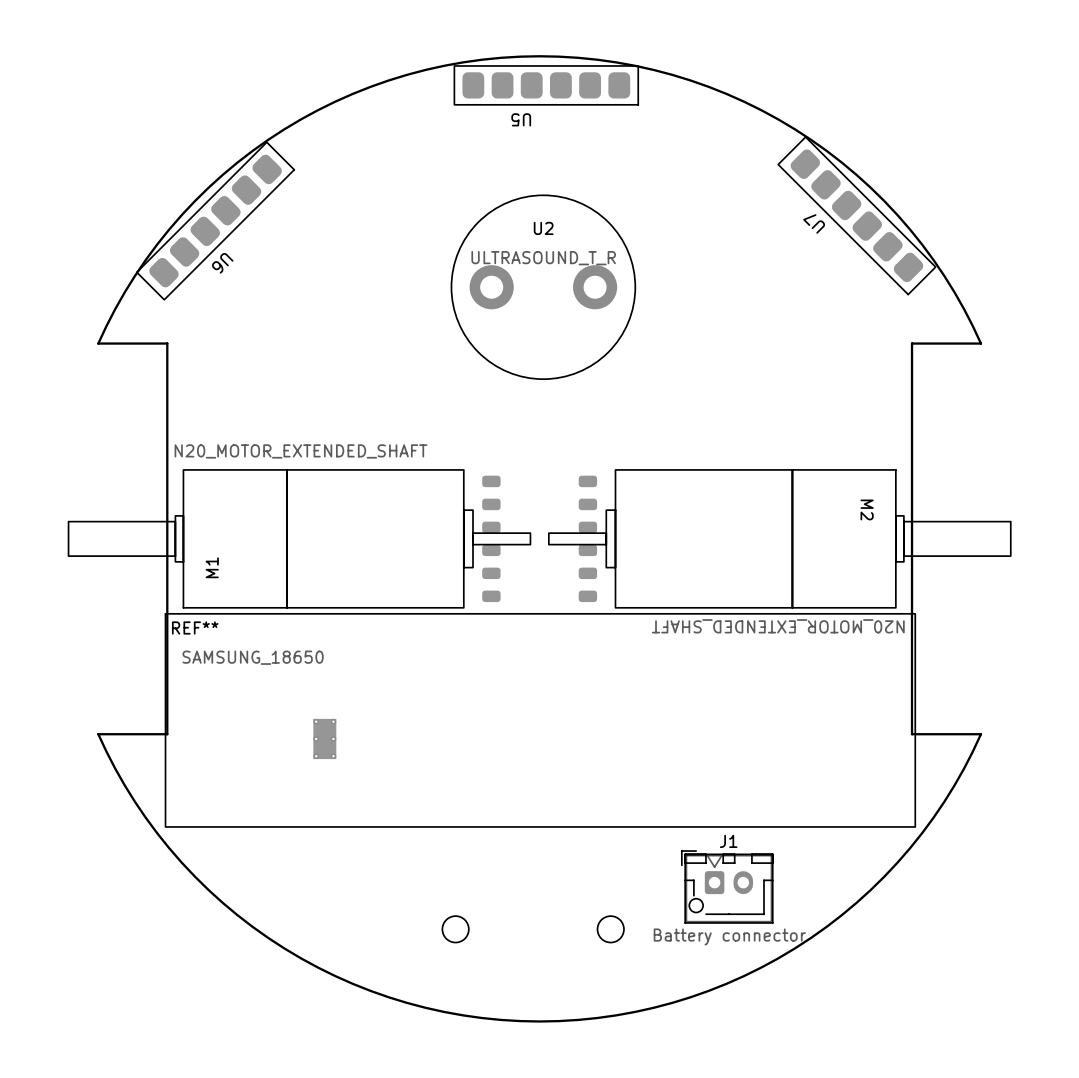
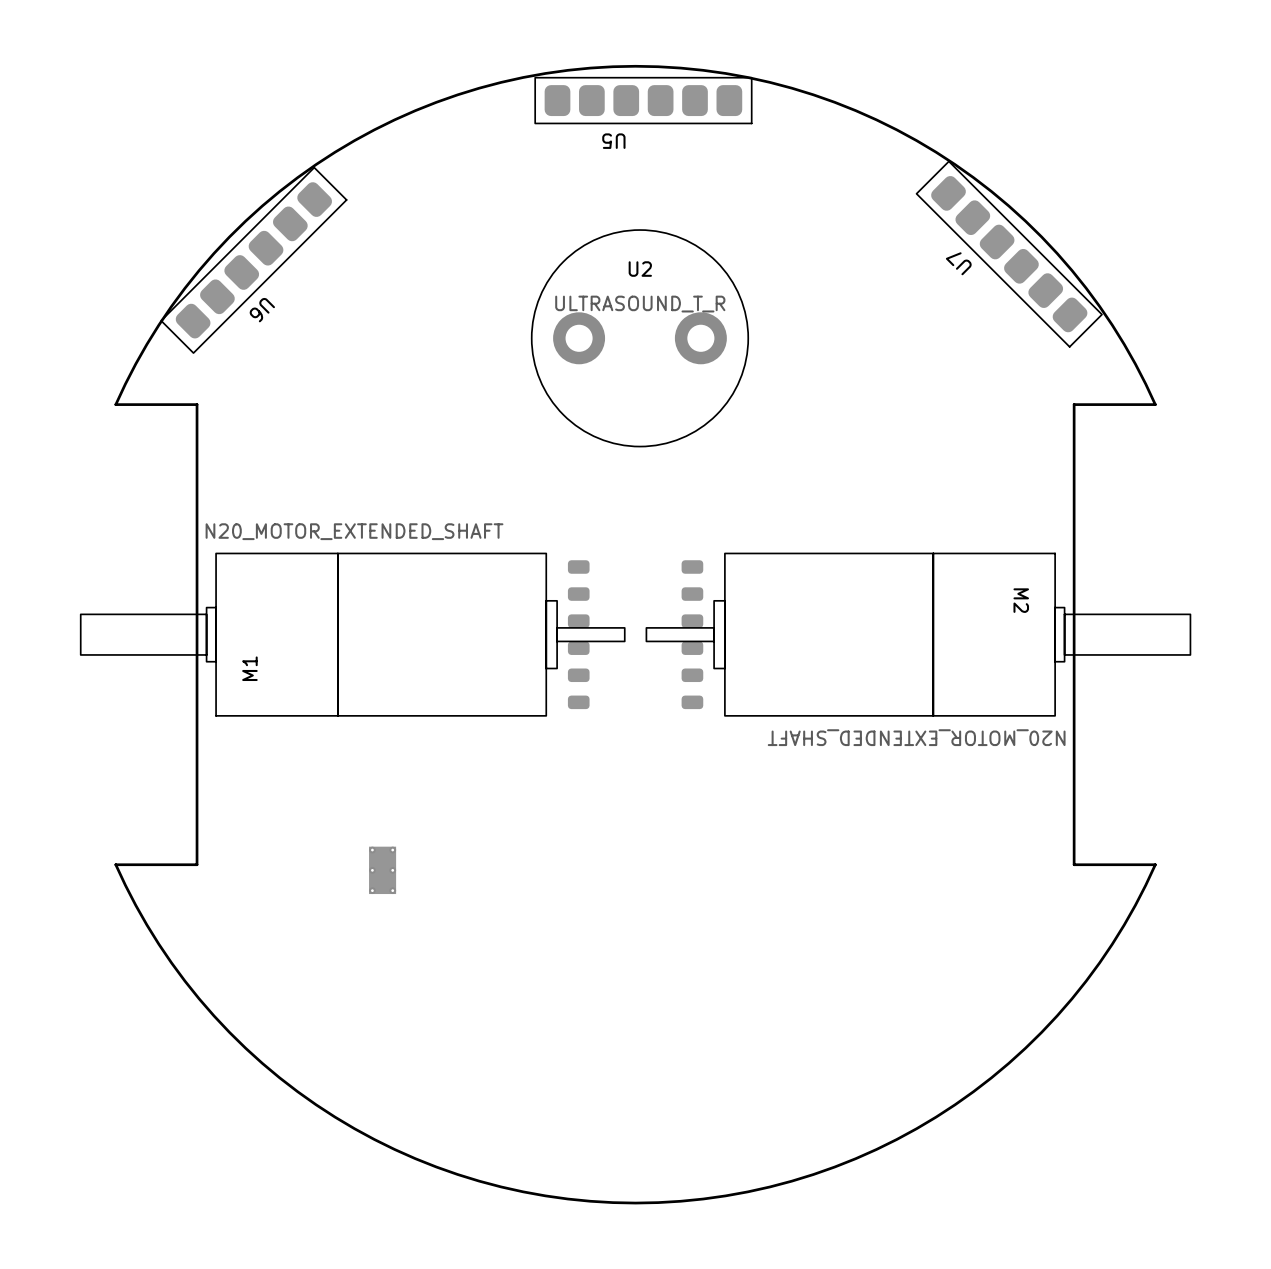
REF**: SAMSUNG_18650 (540, 720) -> none
J1: Battery connector (727, 886) -> none
drawing: [441, 915, 625, 944] -> none

